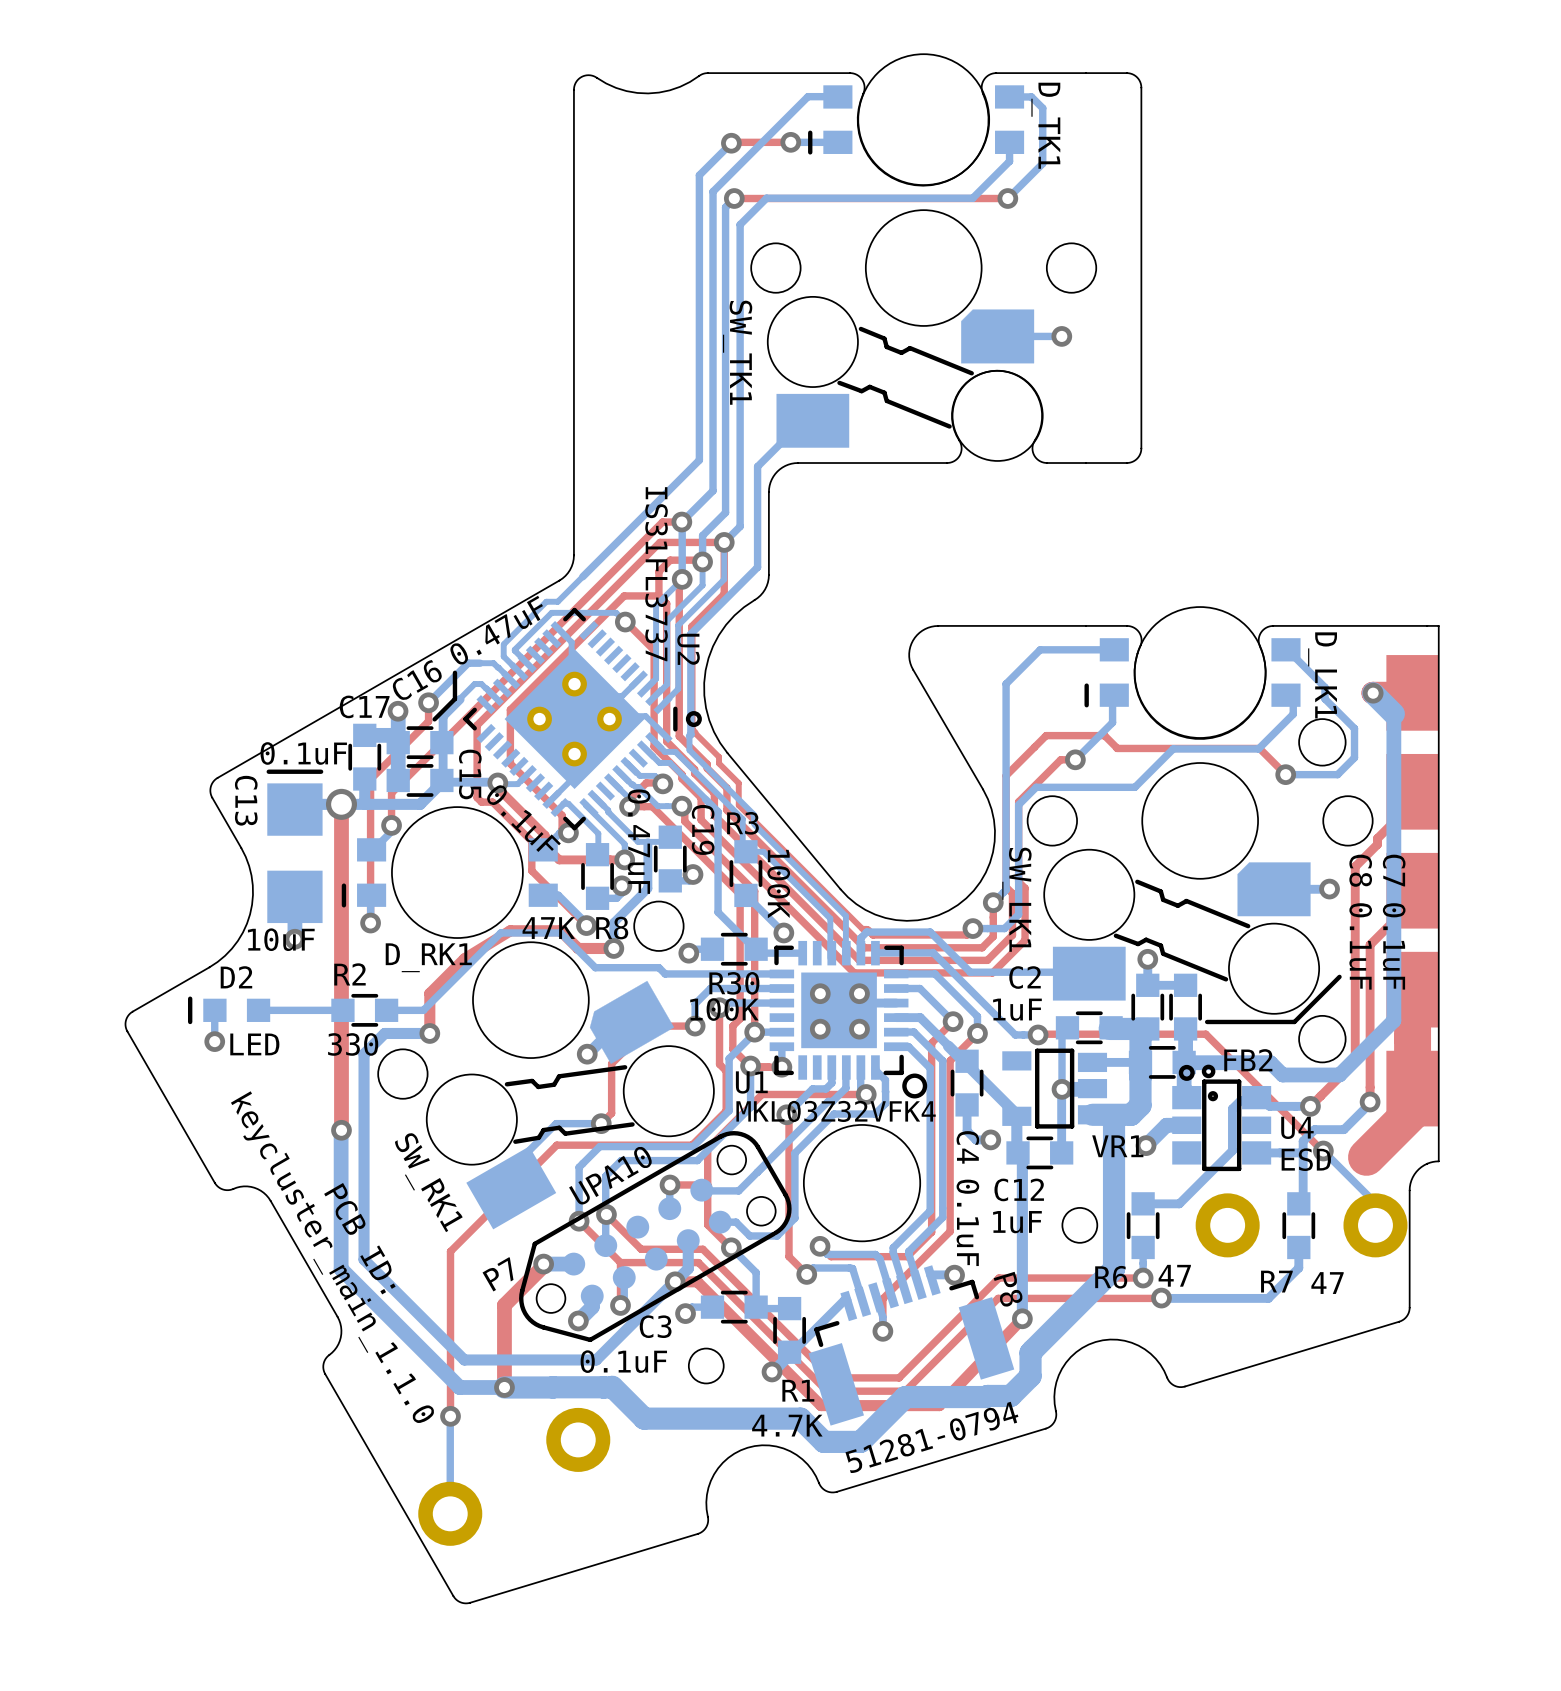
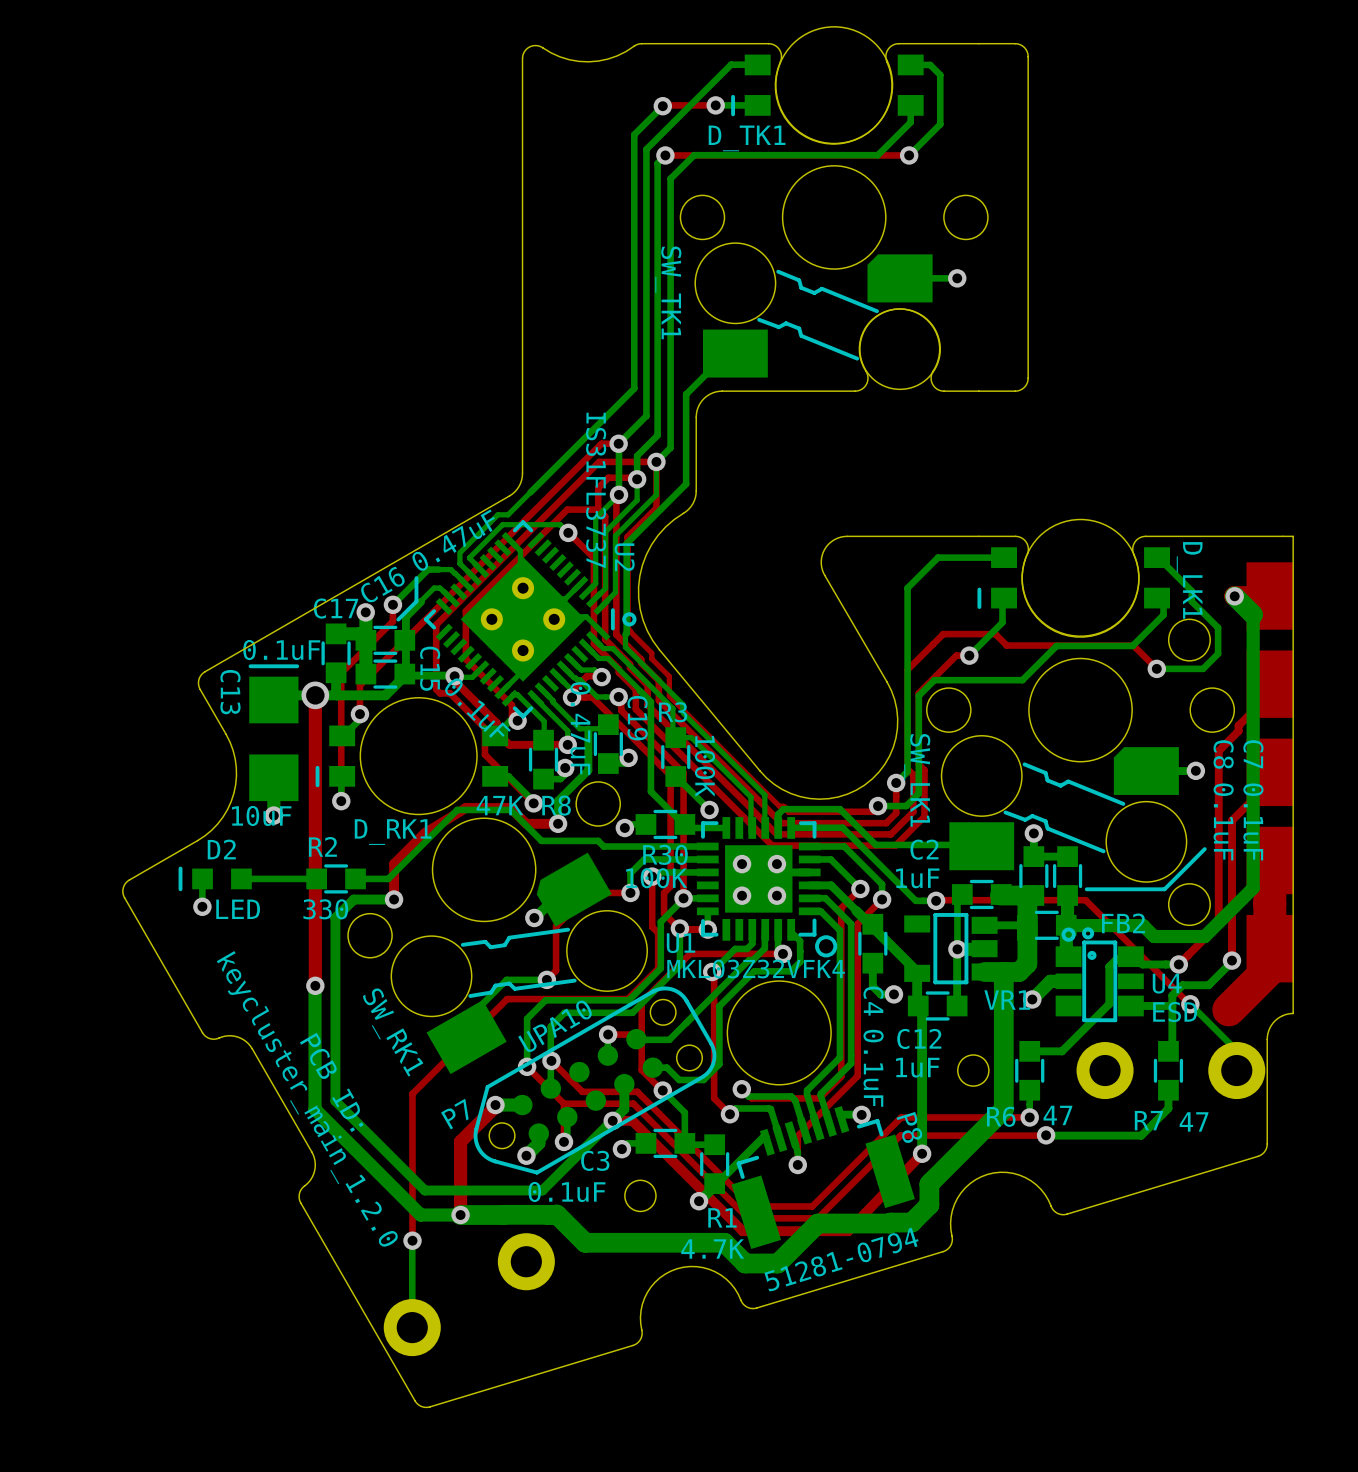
D_TK1 name rotation: 0° (1045, 125) -> 90° counterclockwise (747, 138)
D_TK1 name position: D_TK1 (1045, 125) -> D_TK1 (747, 138)
text: keycluster_main_1.1.0 (332, 1257) -> keycluster_main_1.2.0 (307, 1098)

